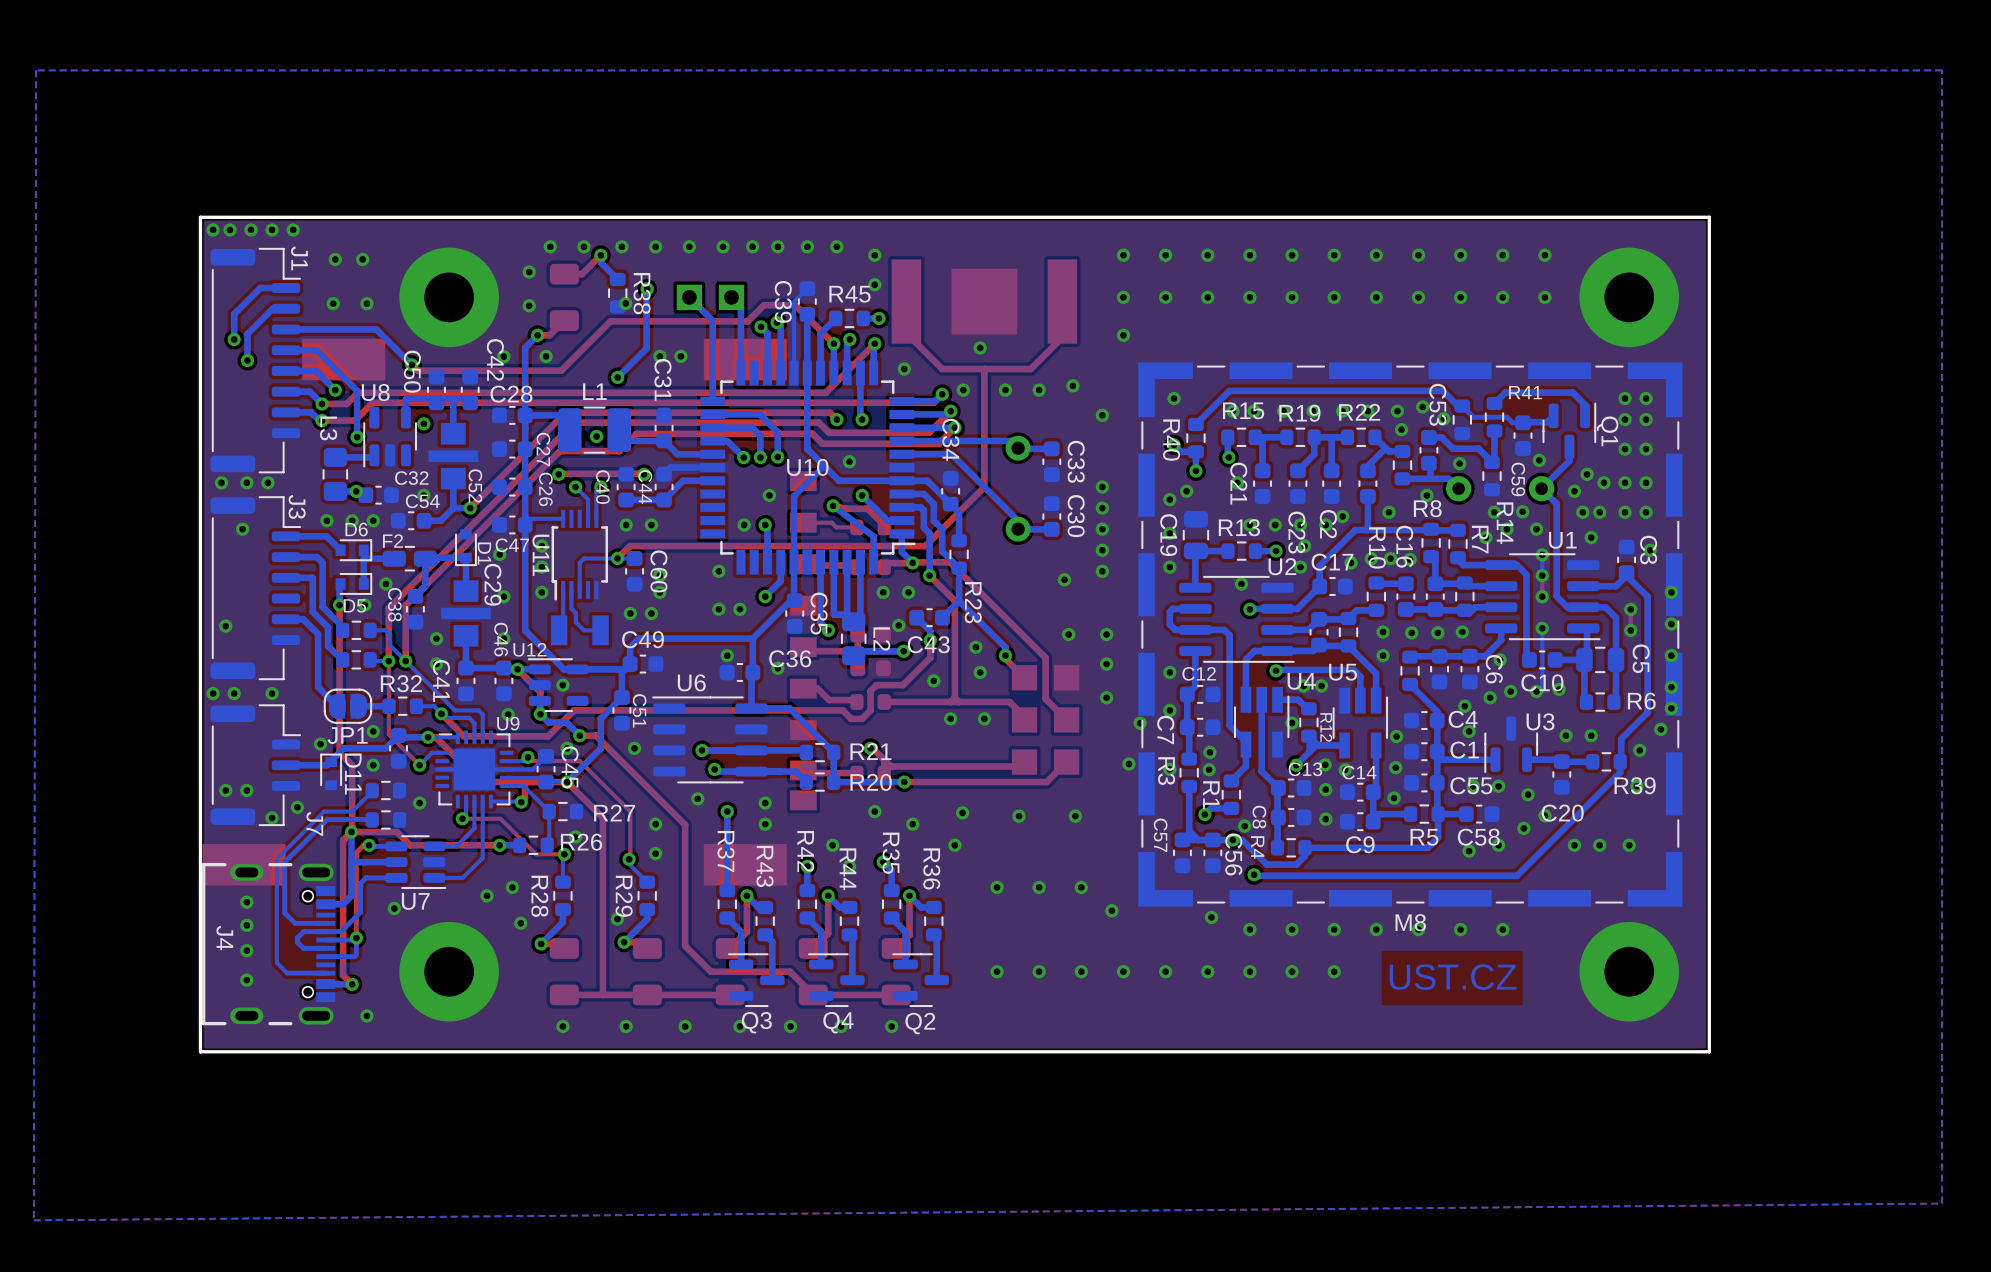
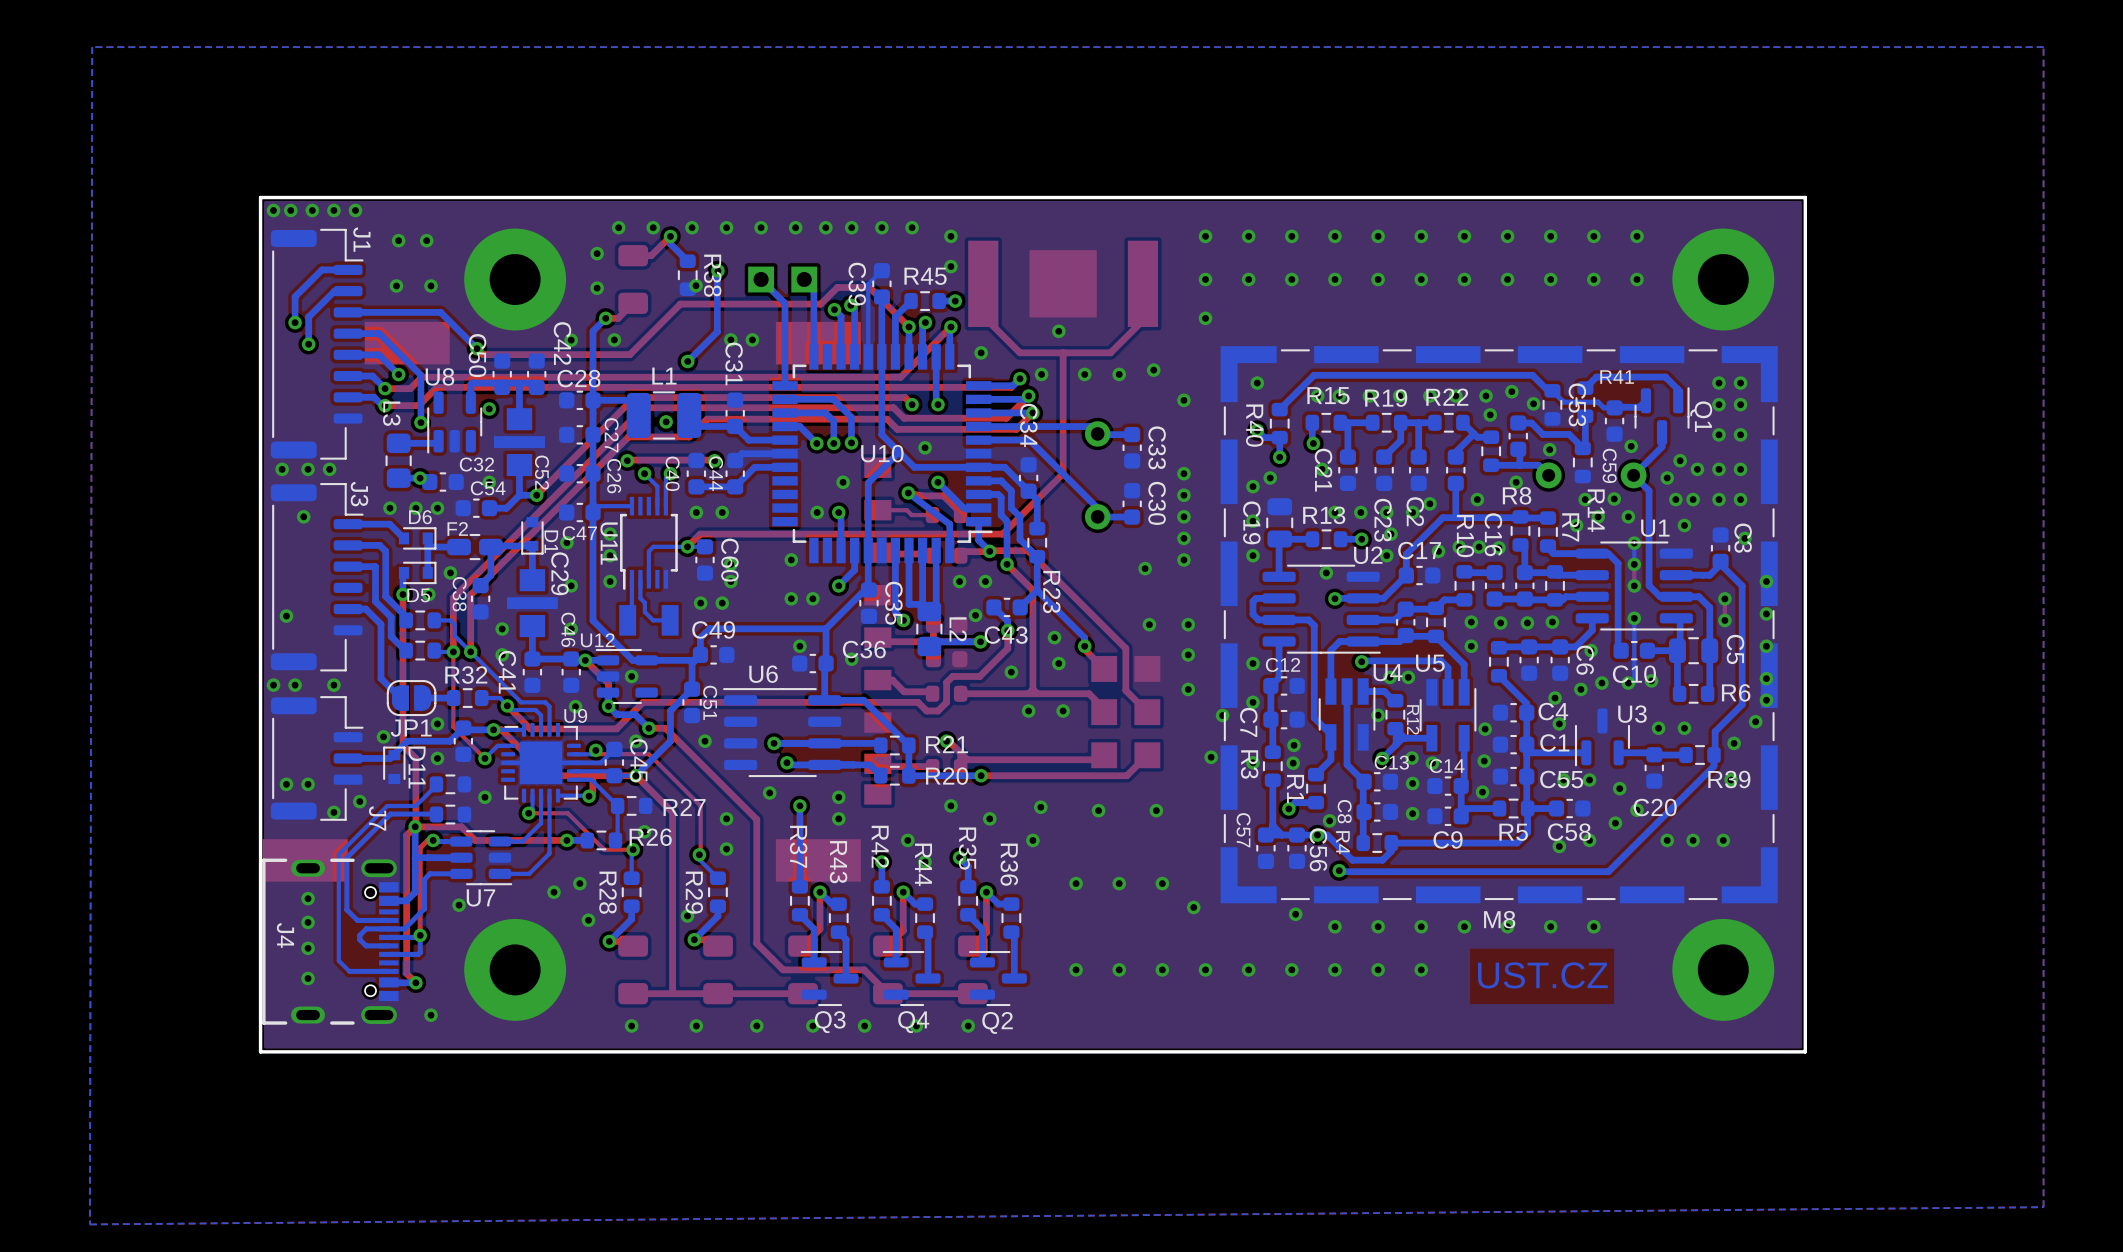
C53 name position: C53 (1437, 404) -> C53 (1577, 404)

